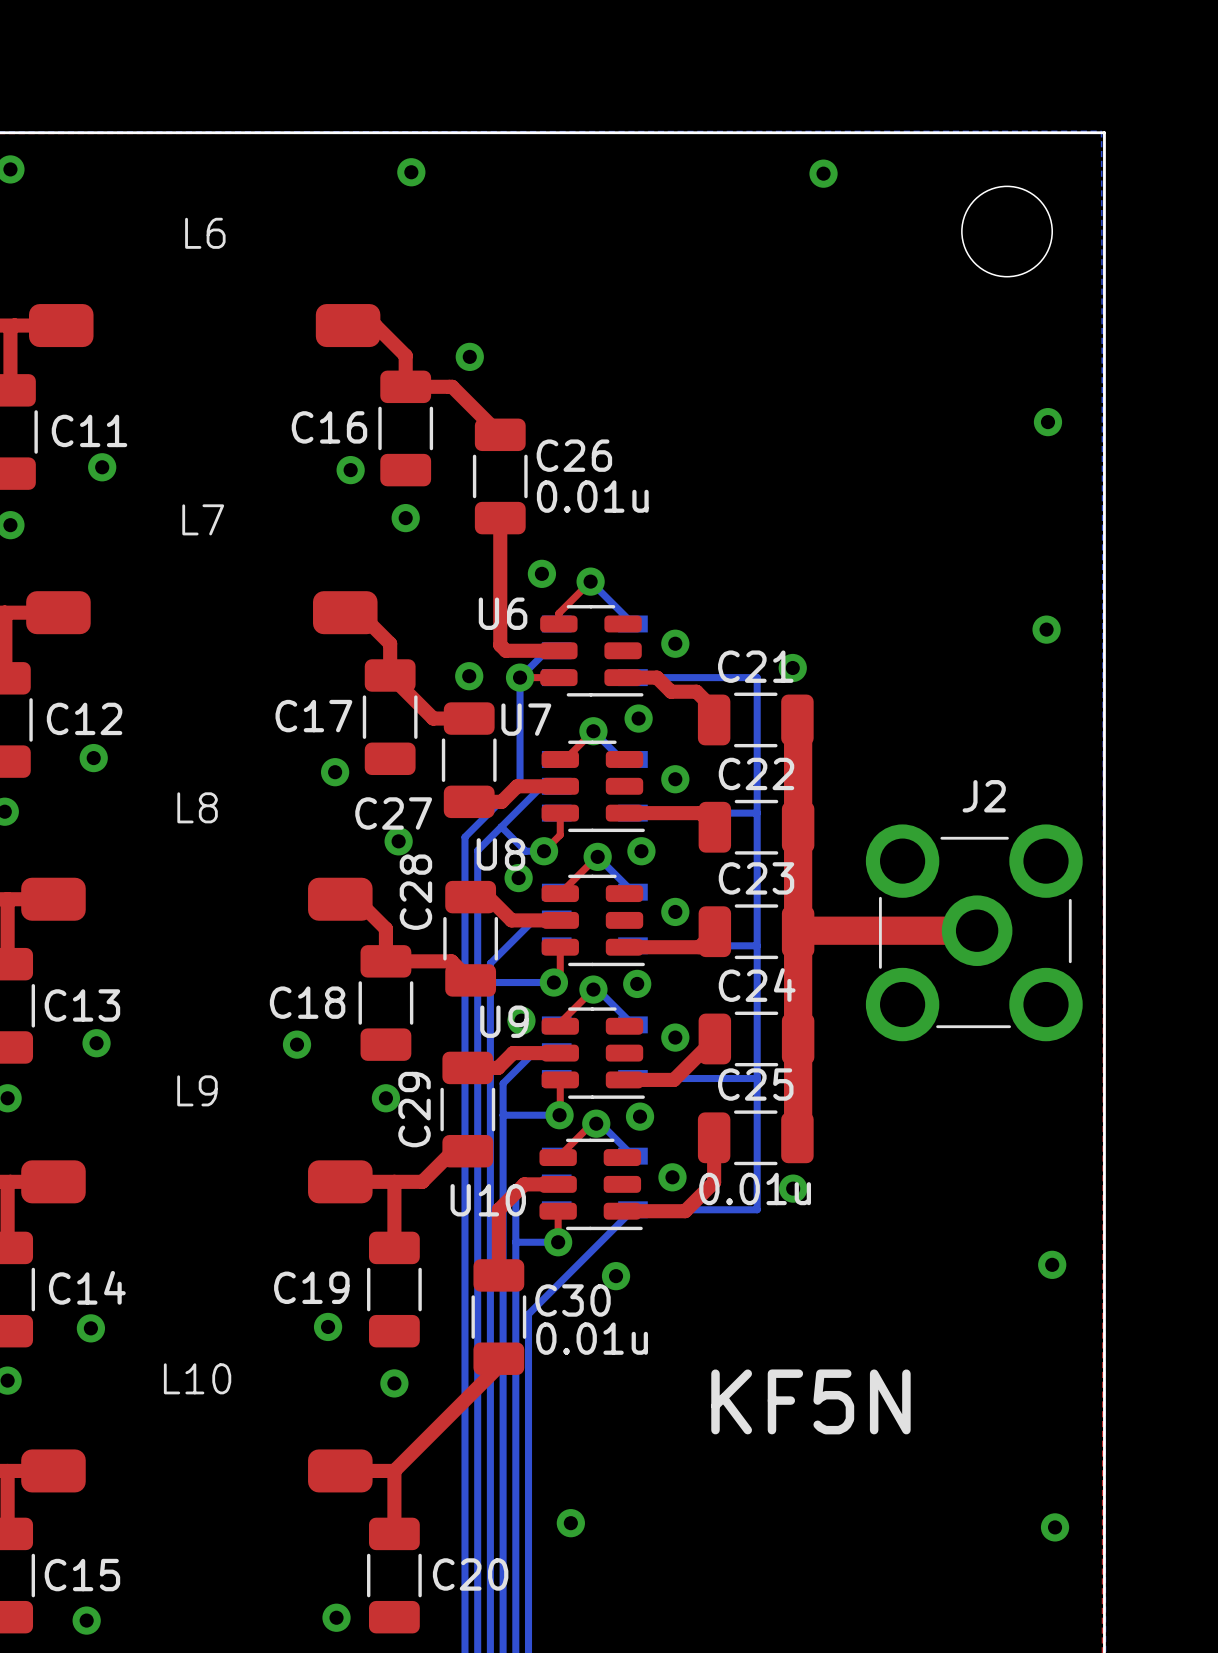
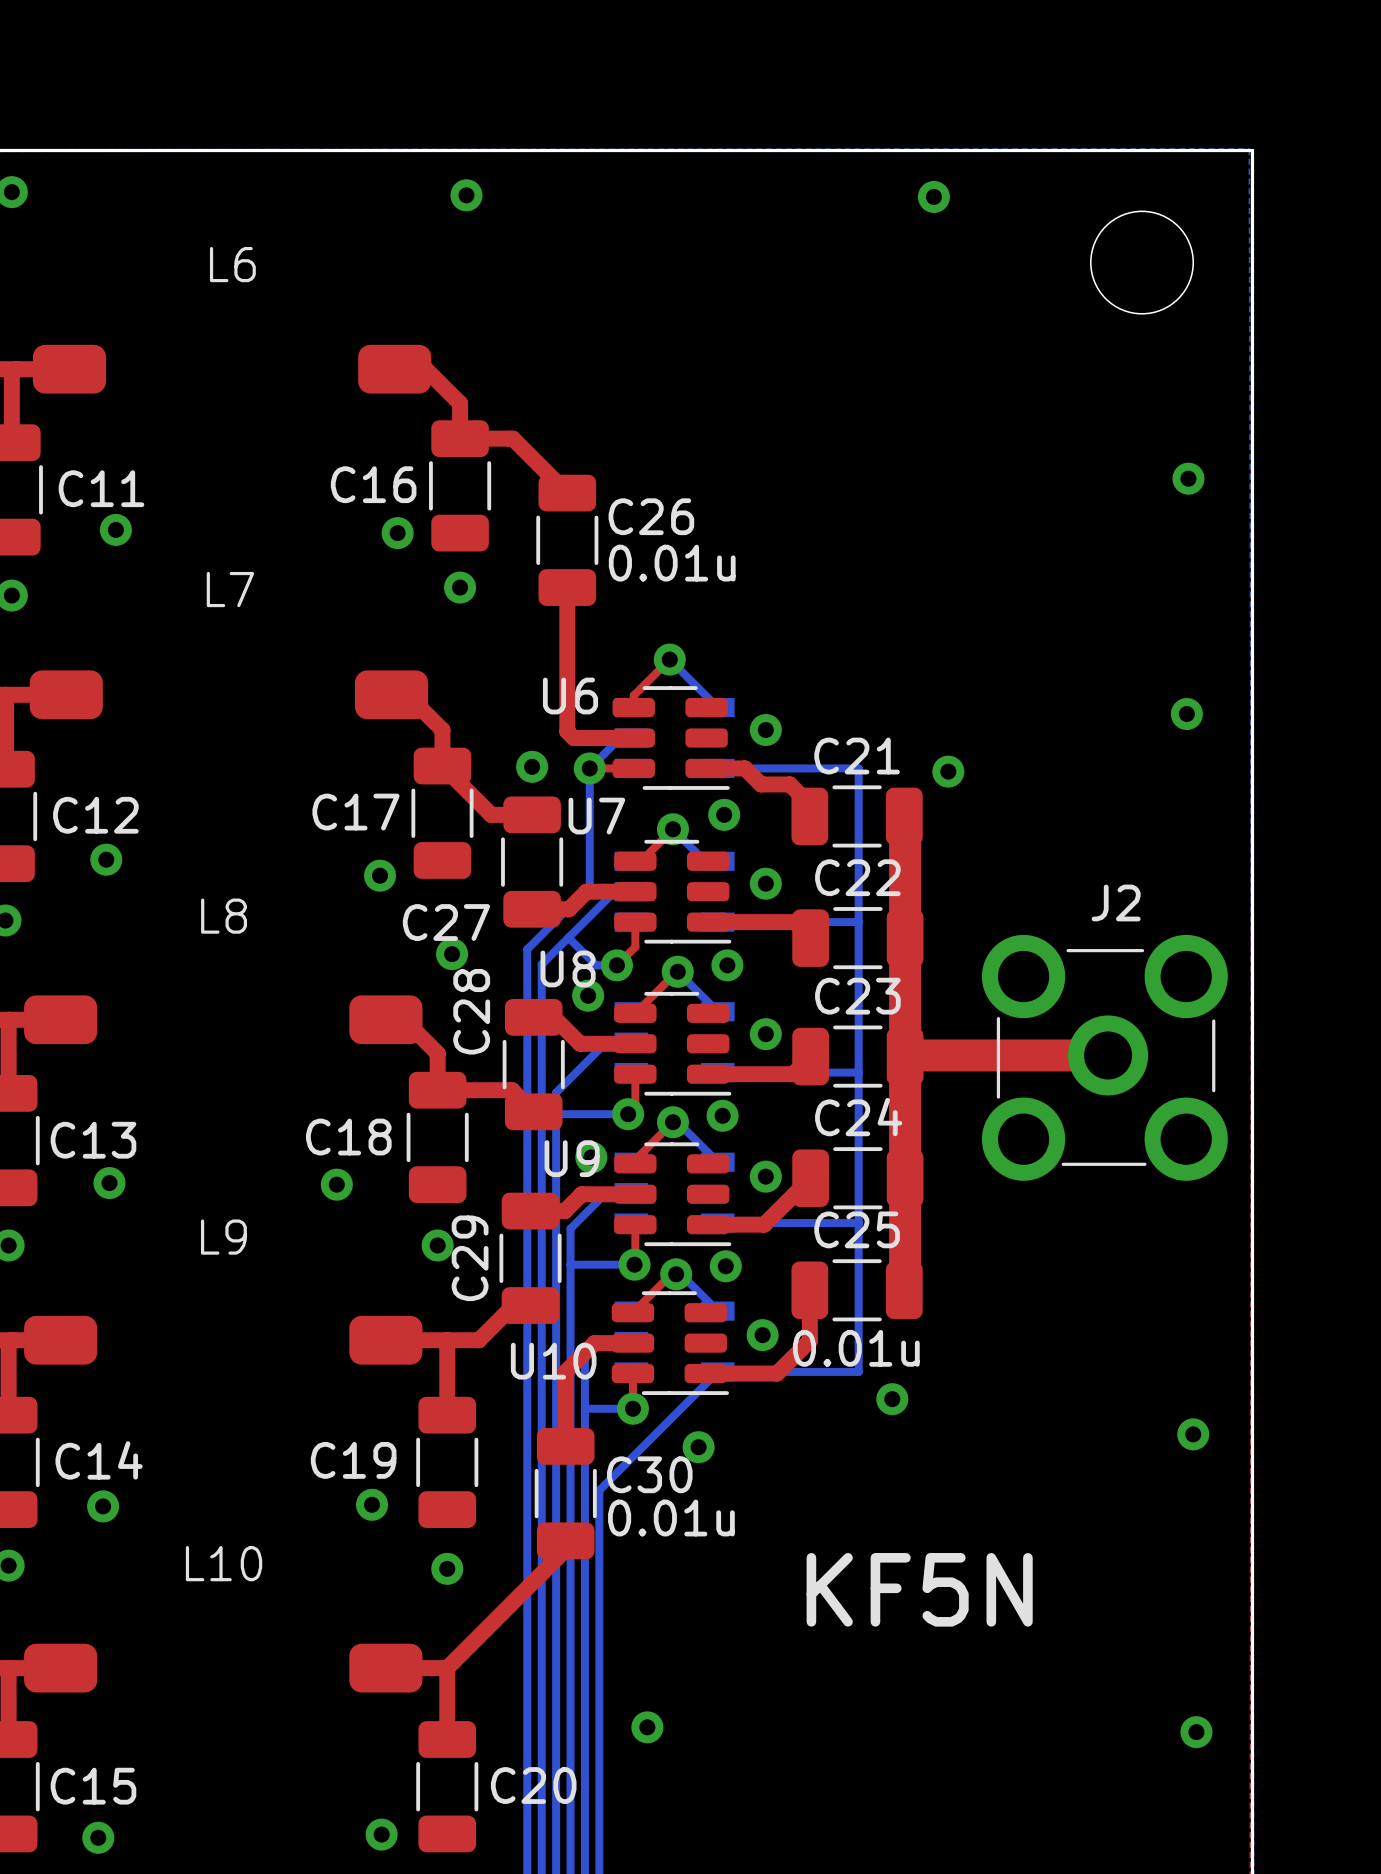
via: (469, 356) -> none
via: (541, 573) -> none
via position: (792, 668) -> (948, 771)
via position: (793, 1188) -> (892, 1399)

